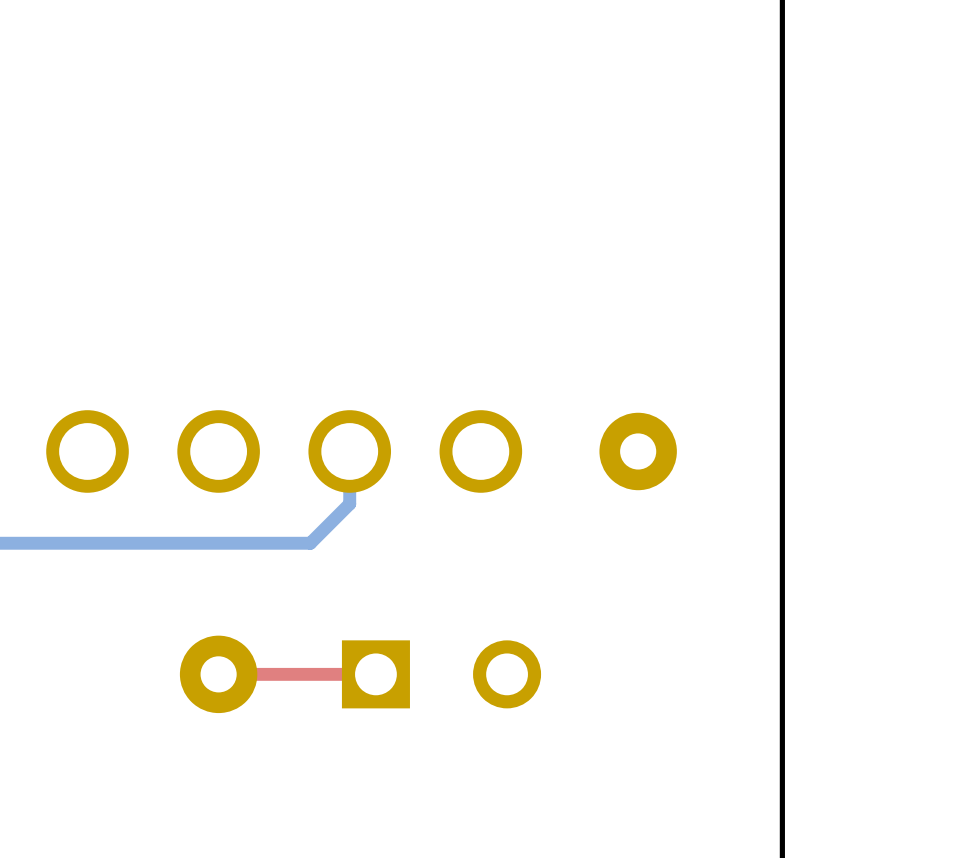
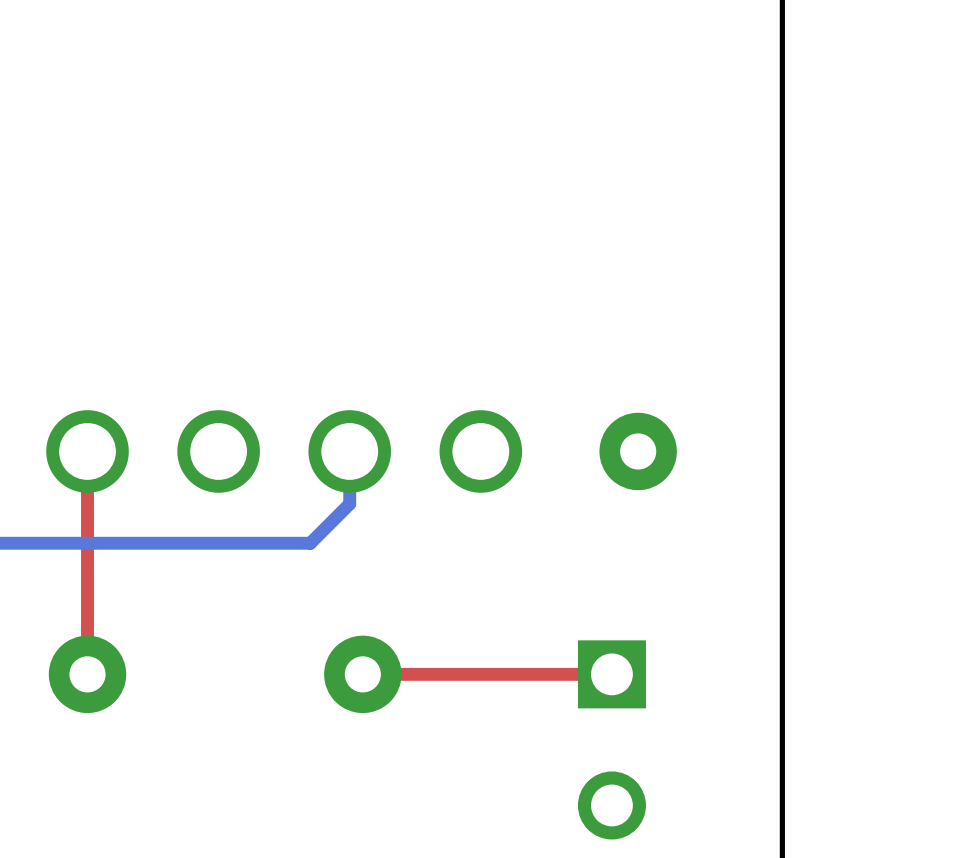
top track: none -> (87, 451) (87, 674)
part: none -> (87, 674)
part: (218, 674) -> none
top track: (362, 674) (218, 674) -> none
part: none -> (362, 674)
part rotation: 0° (441, 674) -> 90° clockwise (611, 739)
part position: (441, 674) -> (611, 739)
top track: none -> (611, 674) (375, 674)

